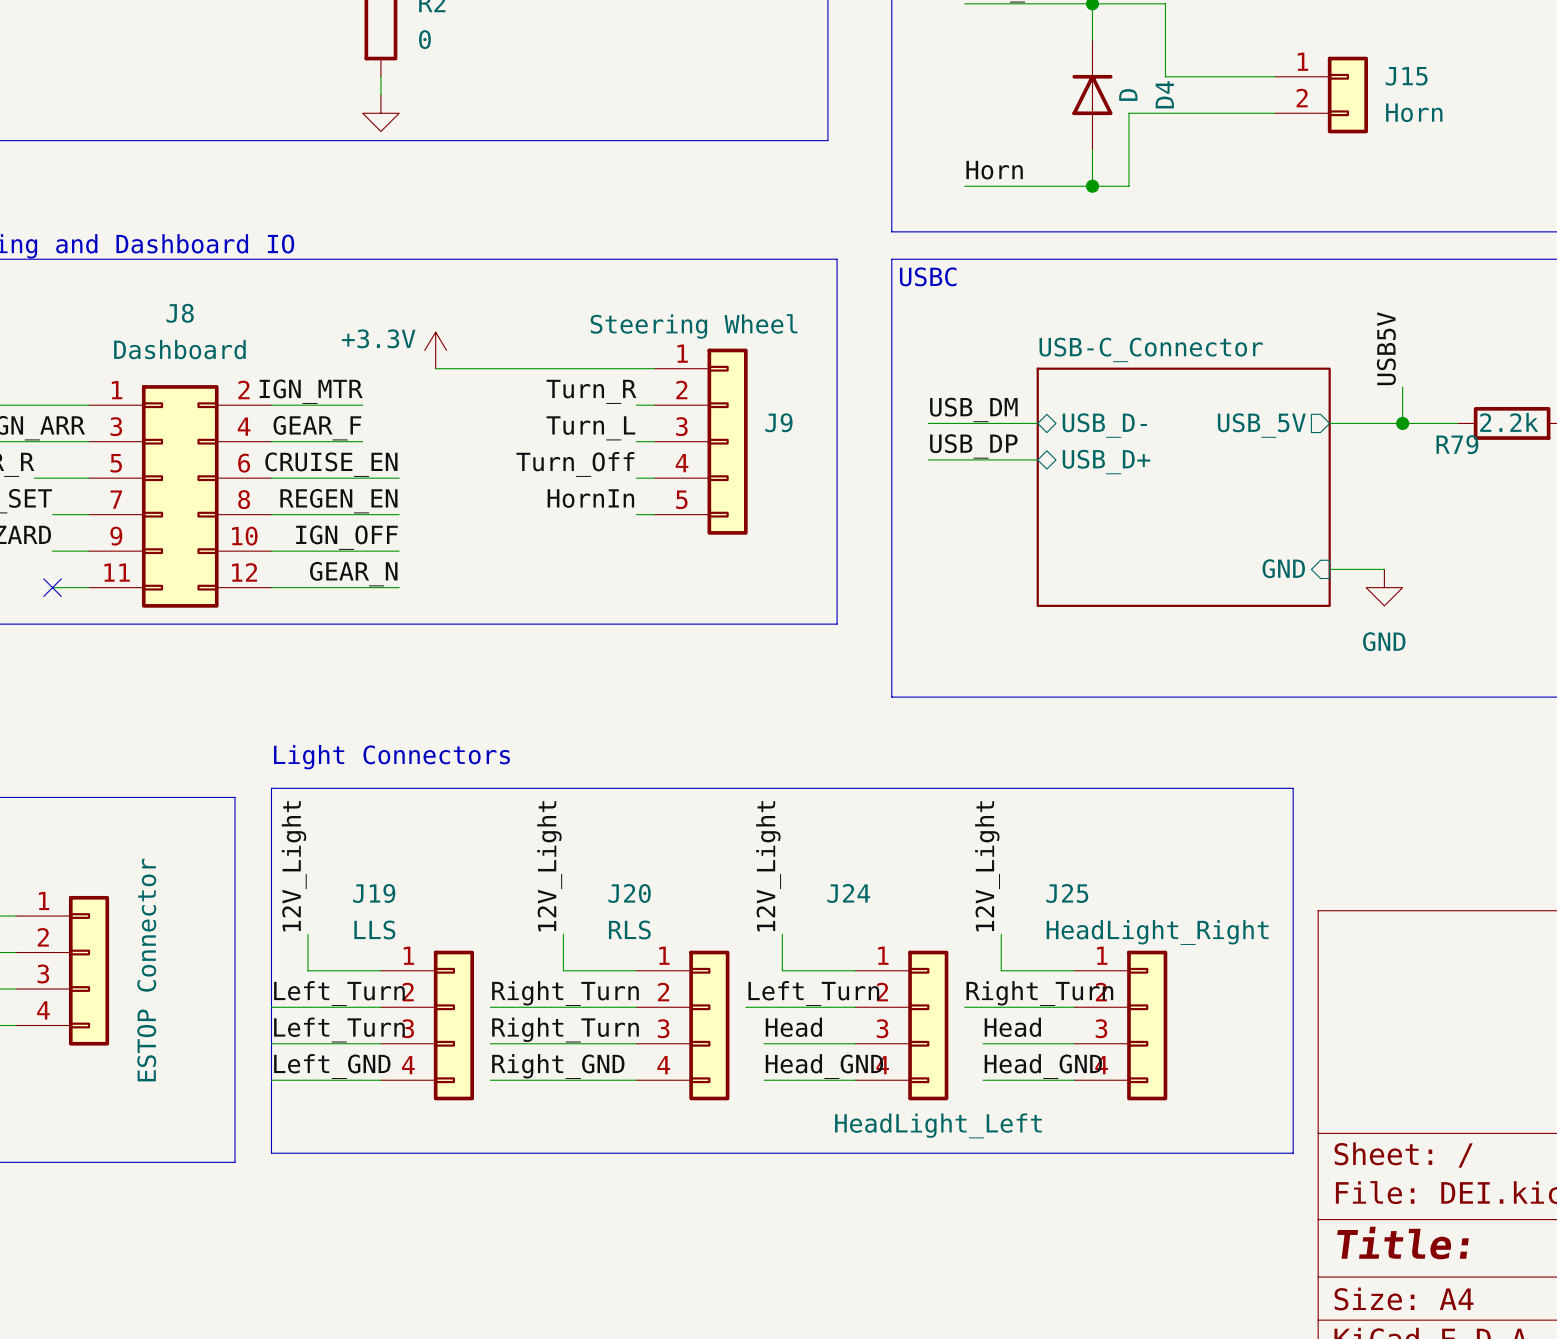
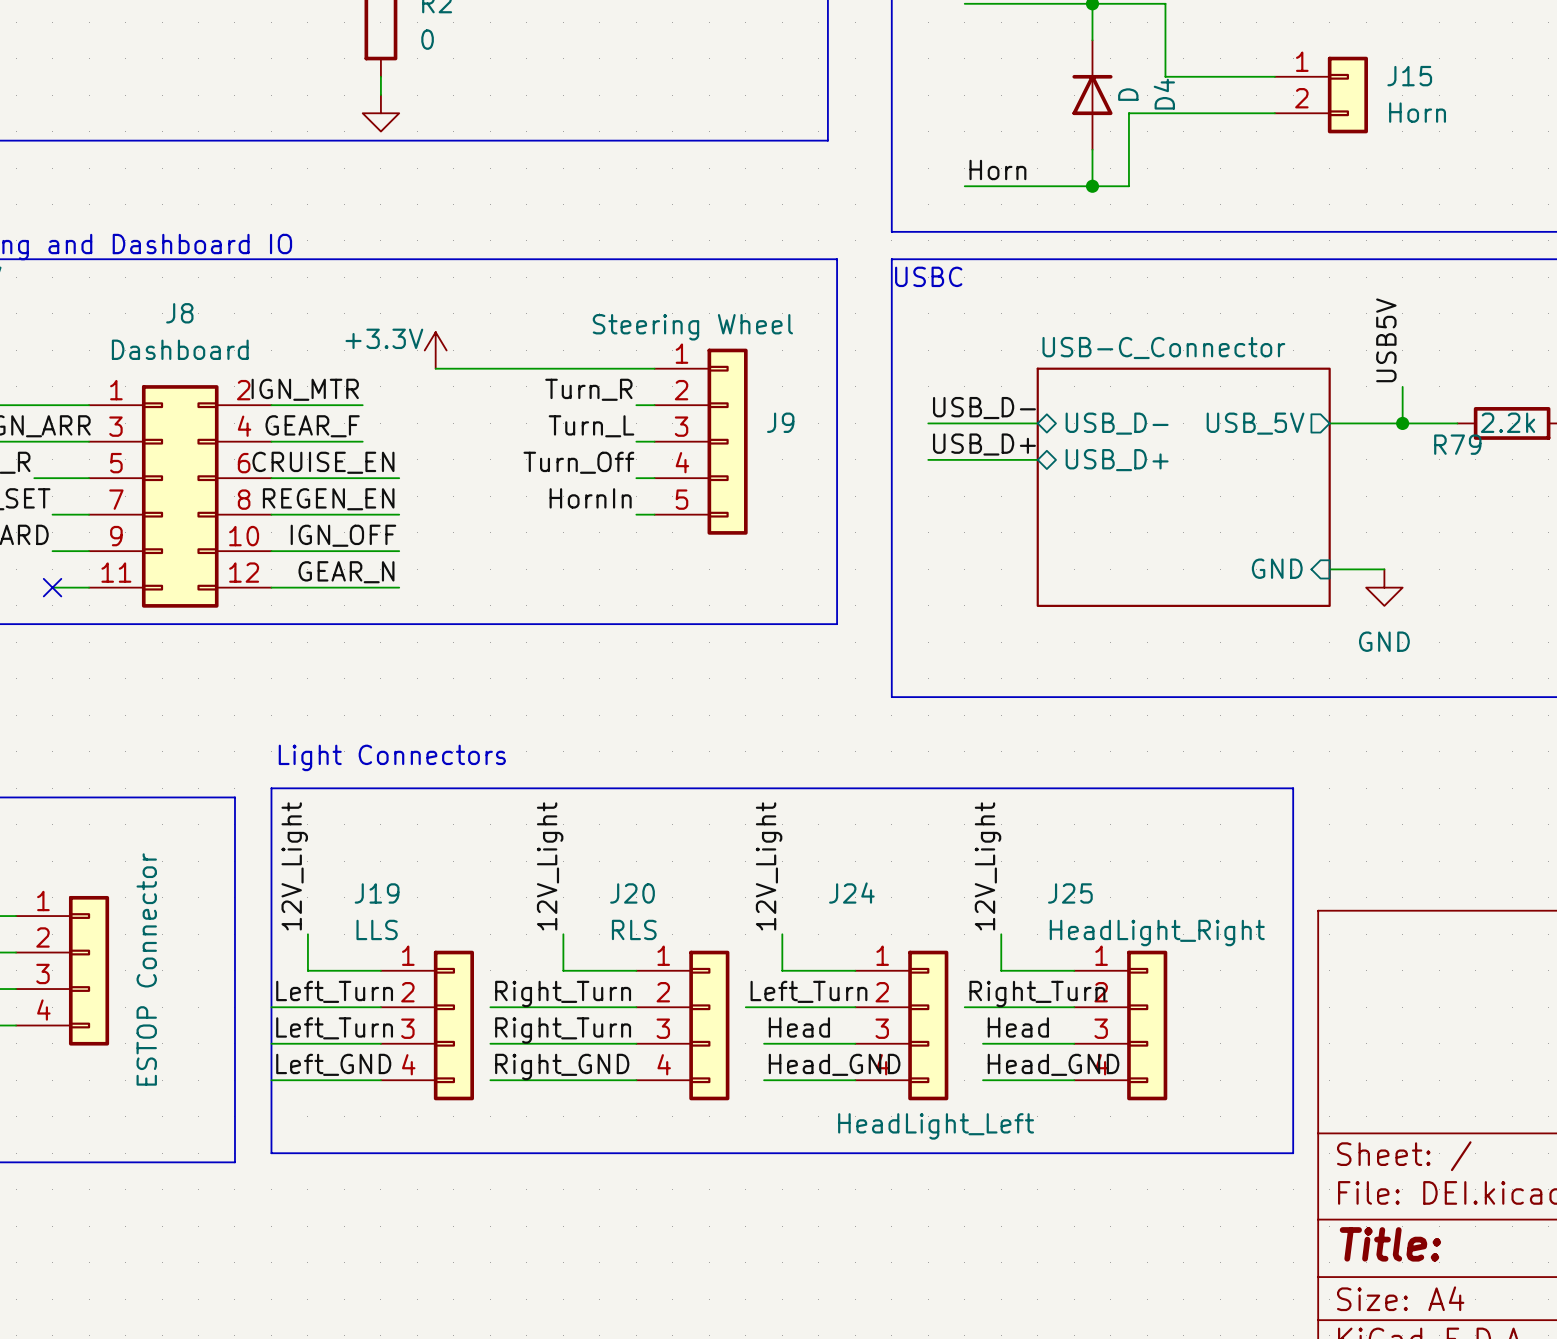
label: USB_DM (973, 409) -> USB_D- (984, 408)
label: USB_DP (973, 446) -> USB_D+ (984, 444)

